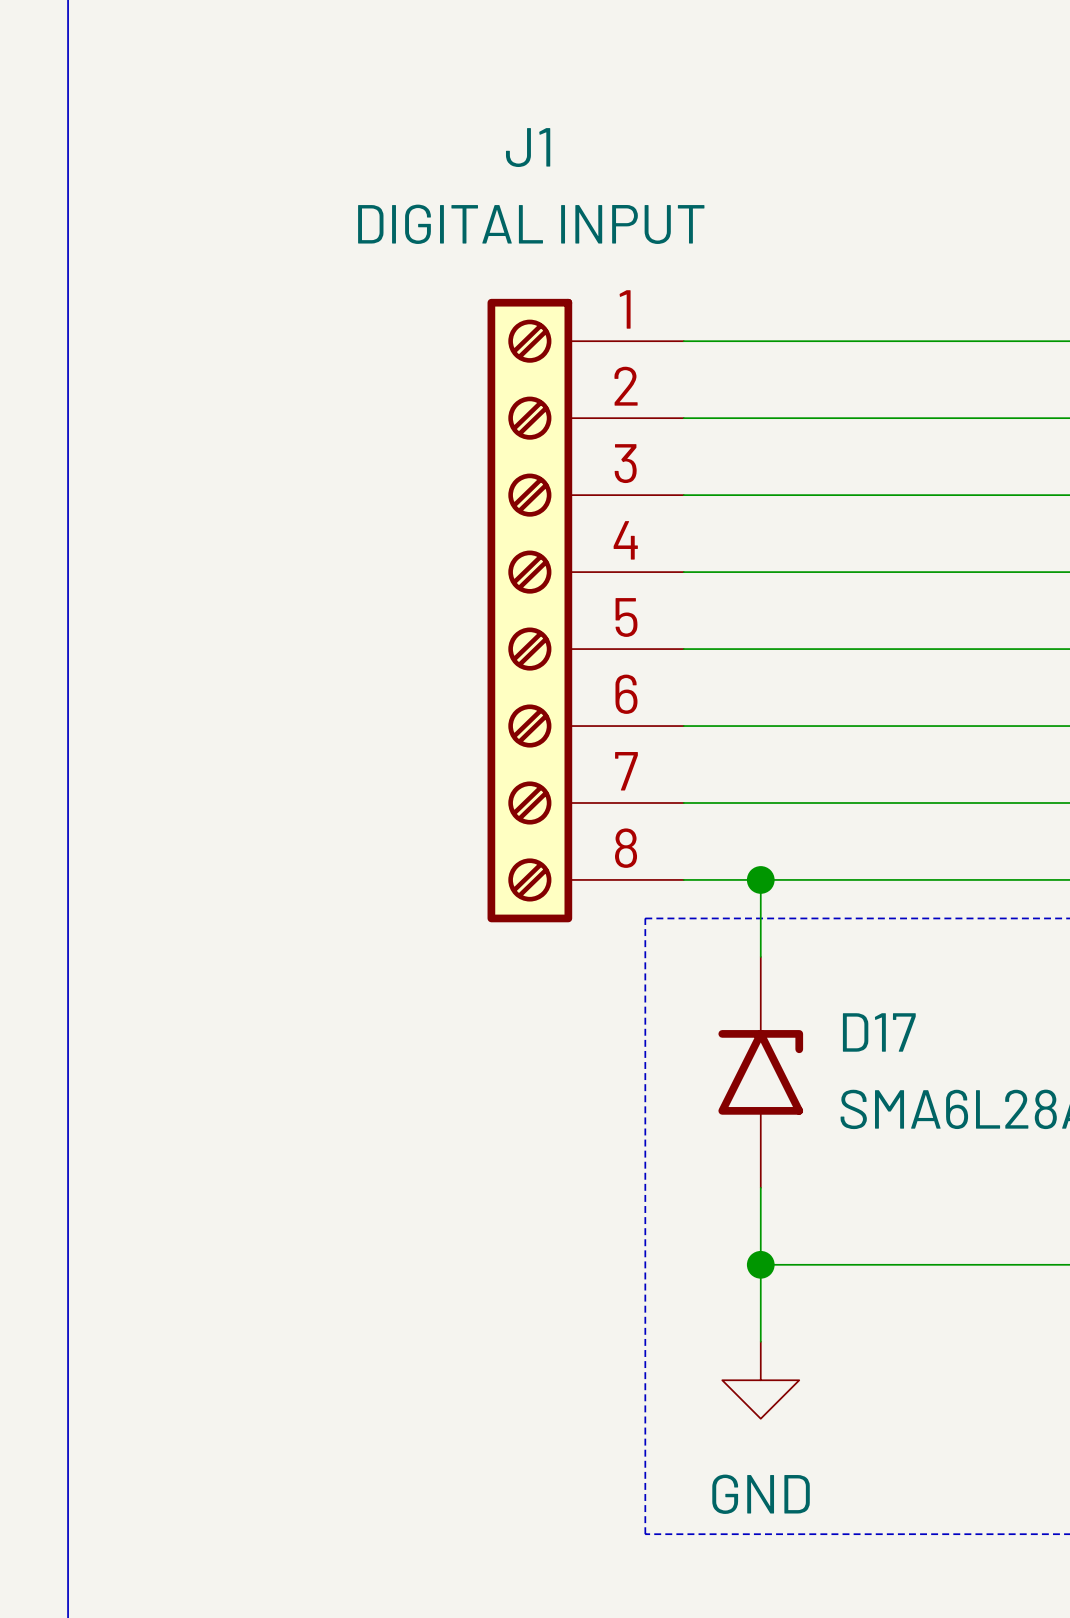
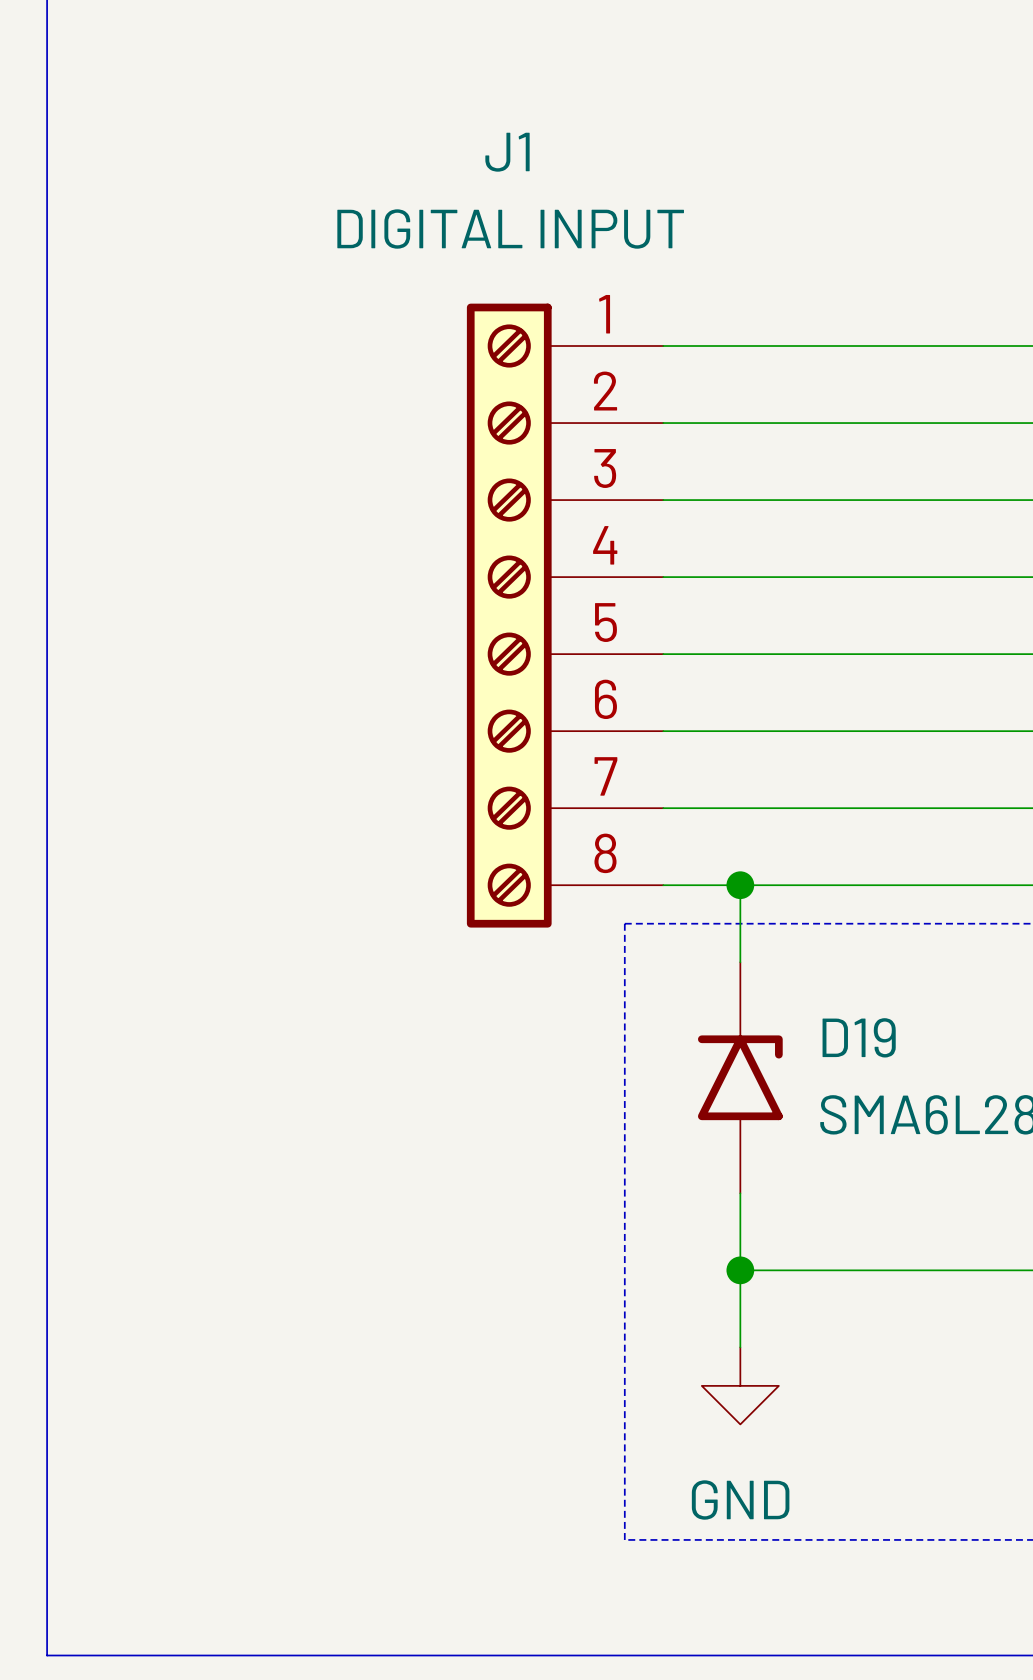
D17 name: D17 (879, 1032) -> D19 (859, 1037)

